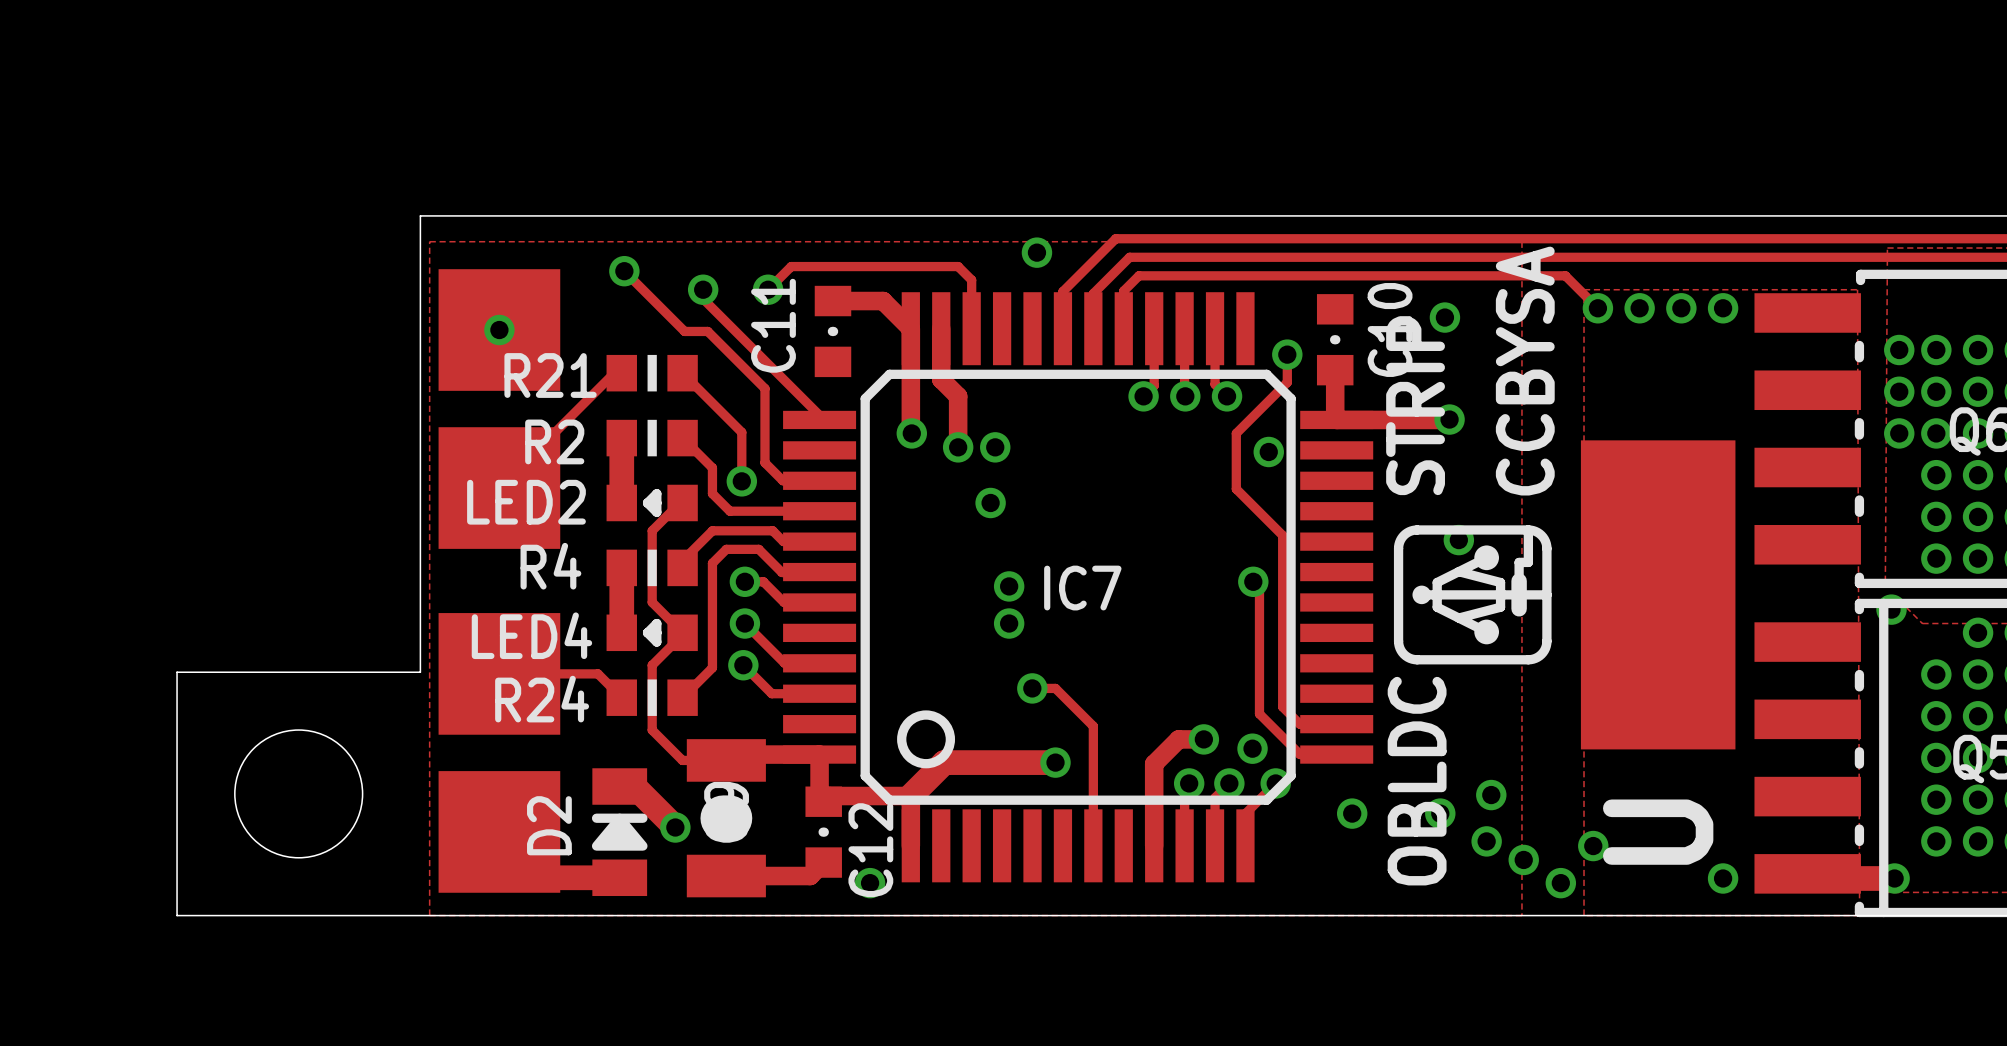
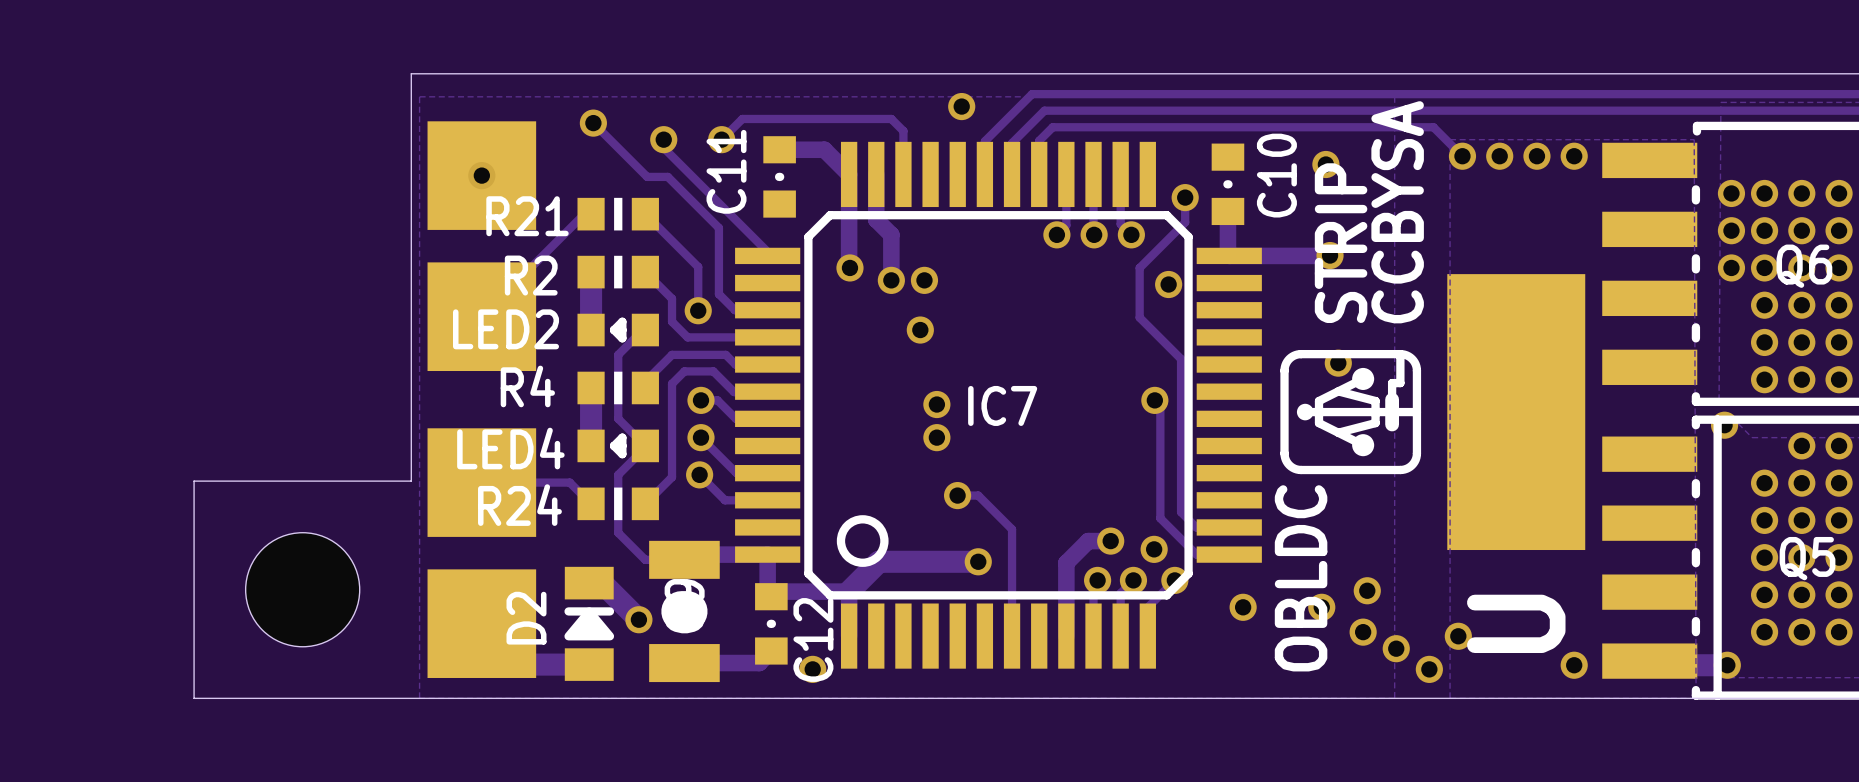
text position: STRIP (1415, 405) -> STRIP (1341, 243)

